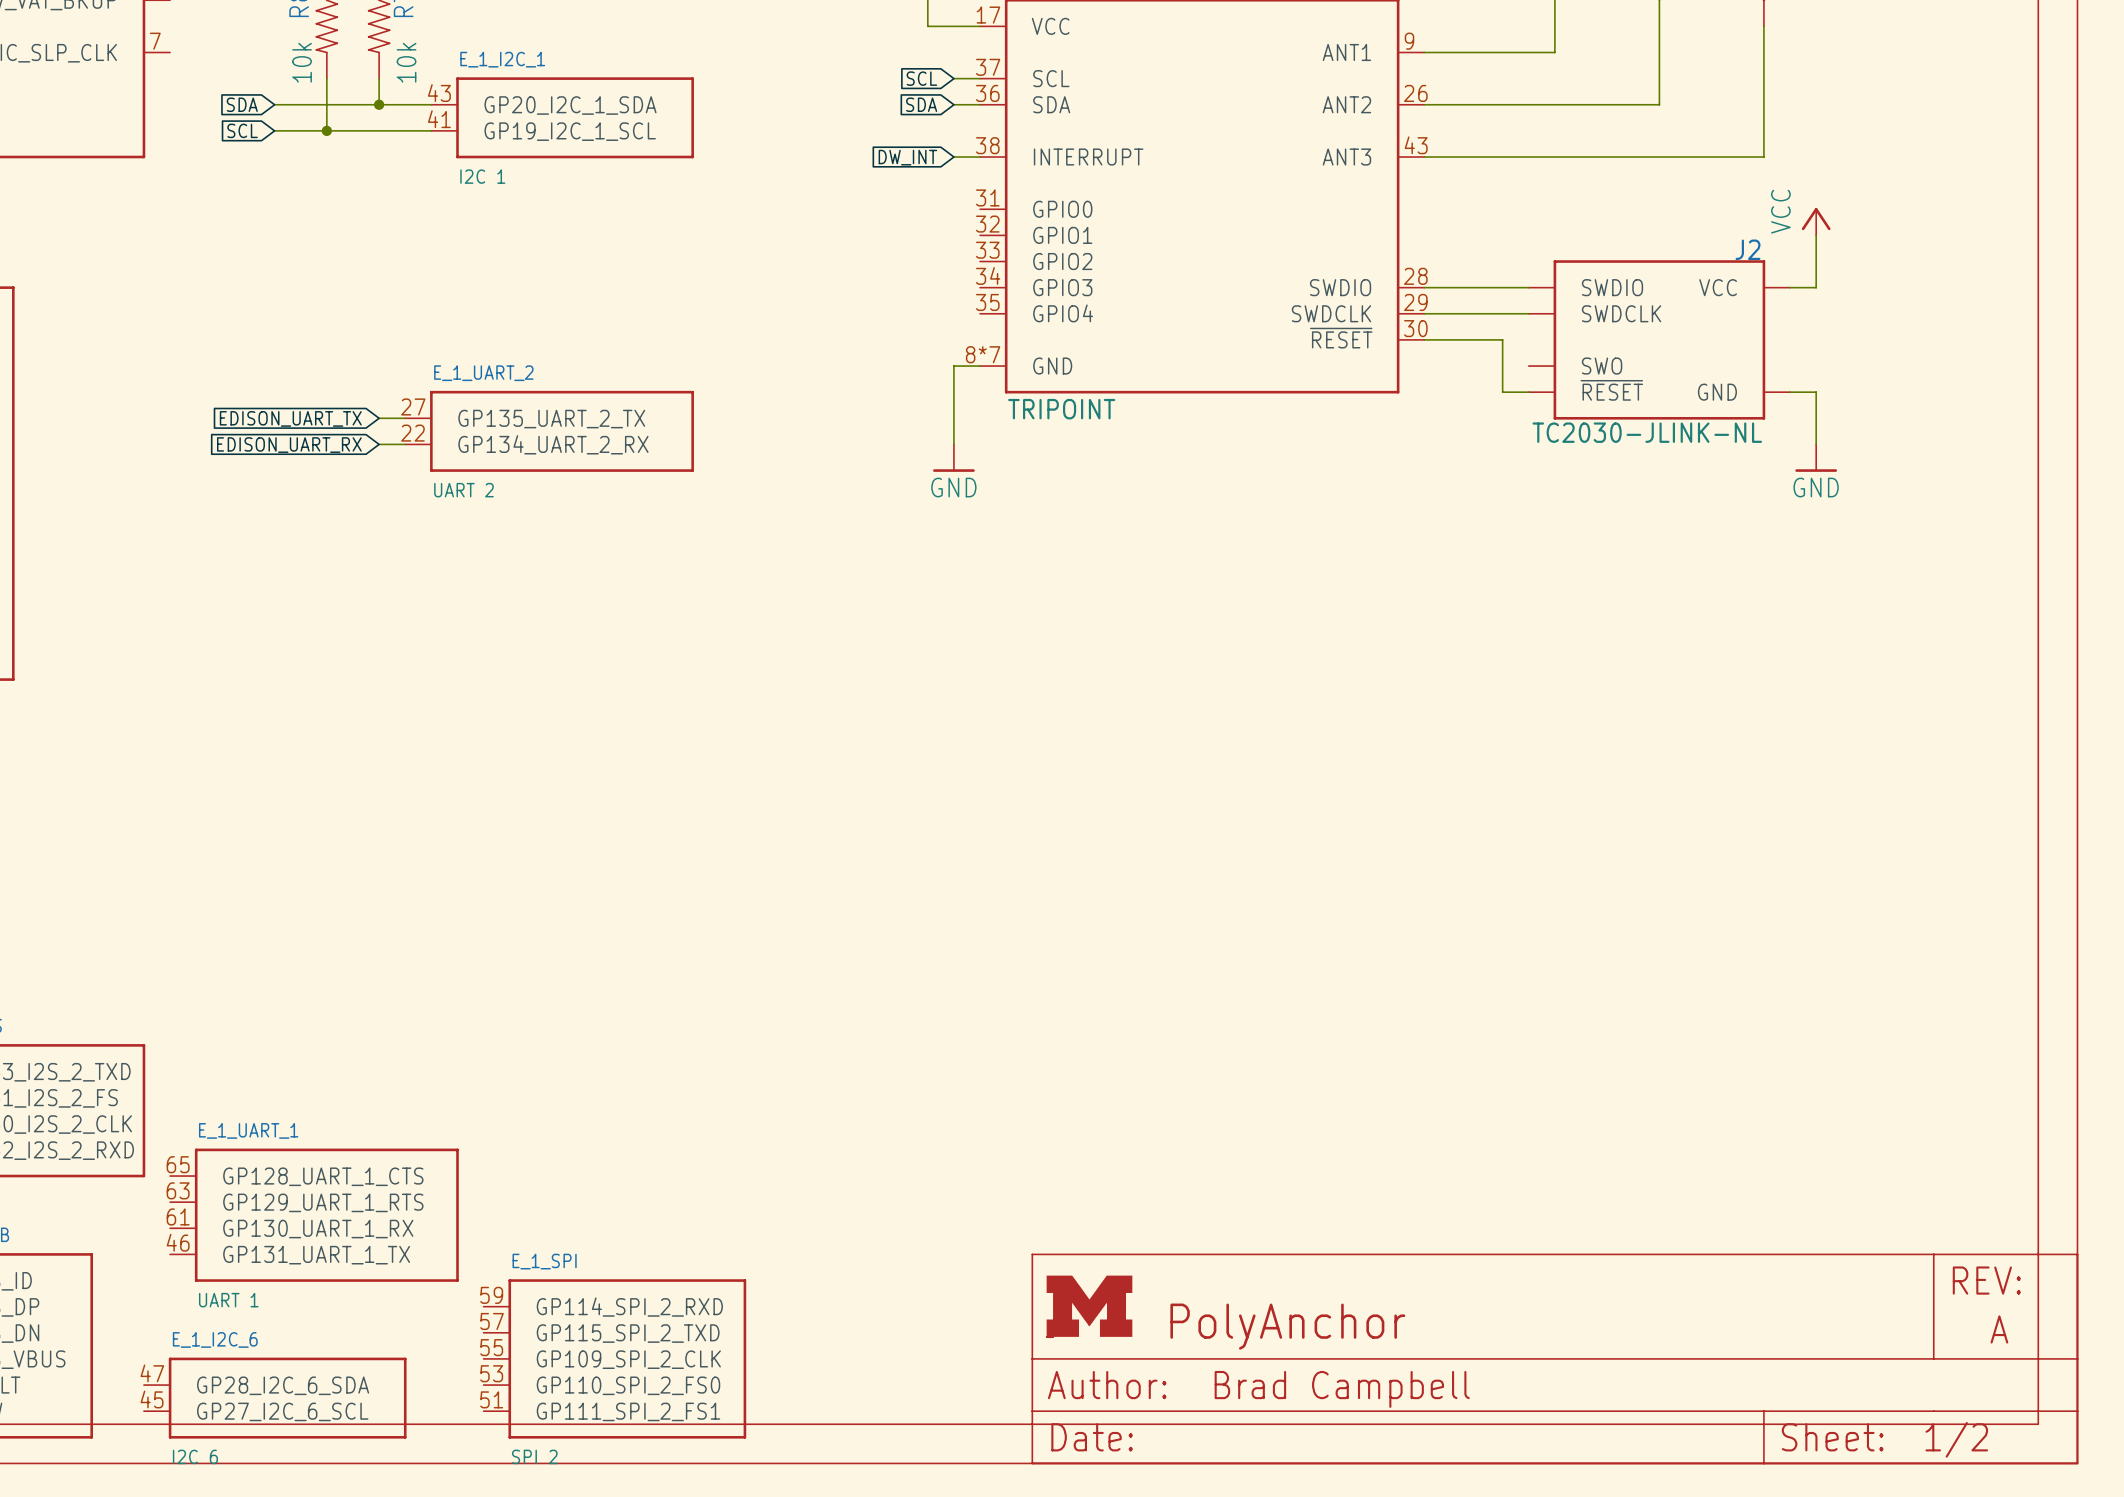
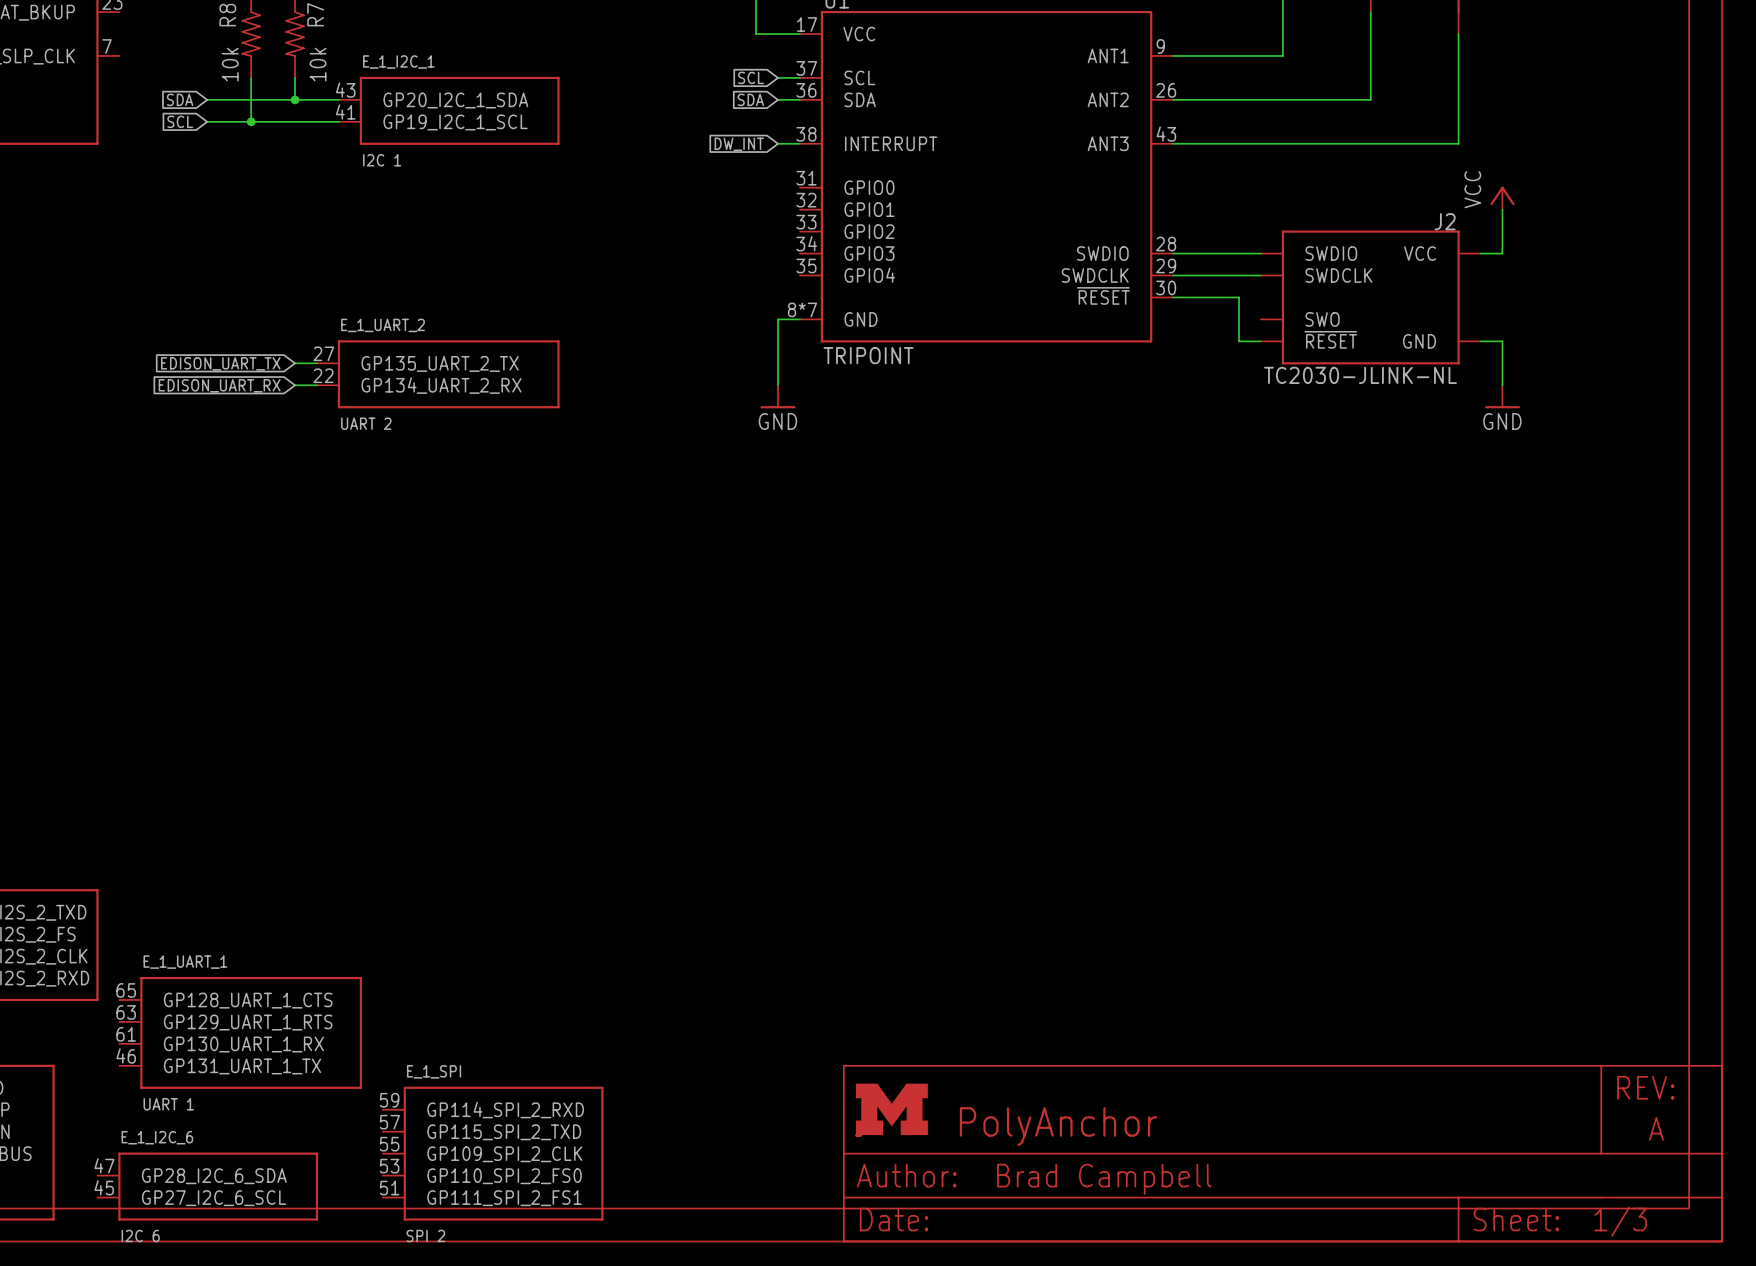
part text: 1/2 (1956, 1439) -> 1/3 (1620, 1221)

